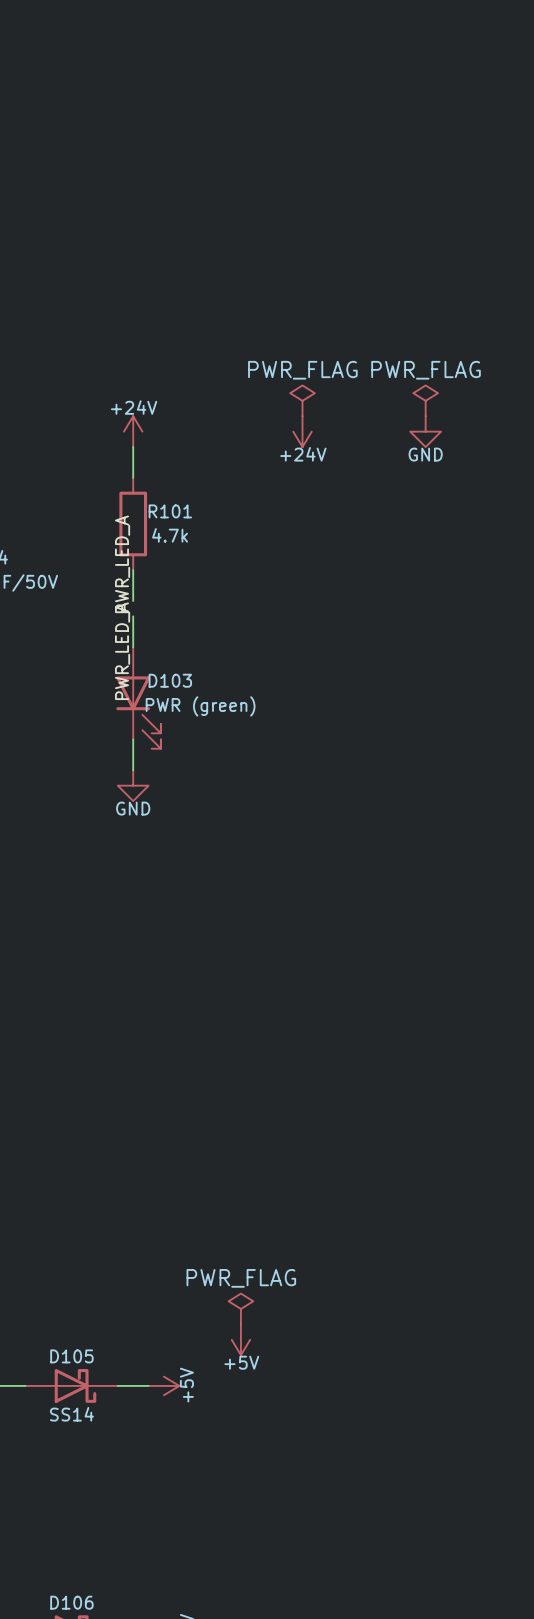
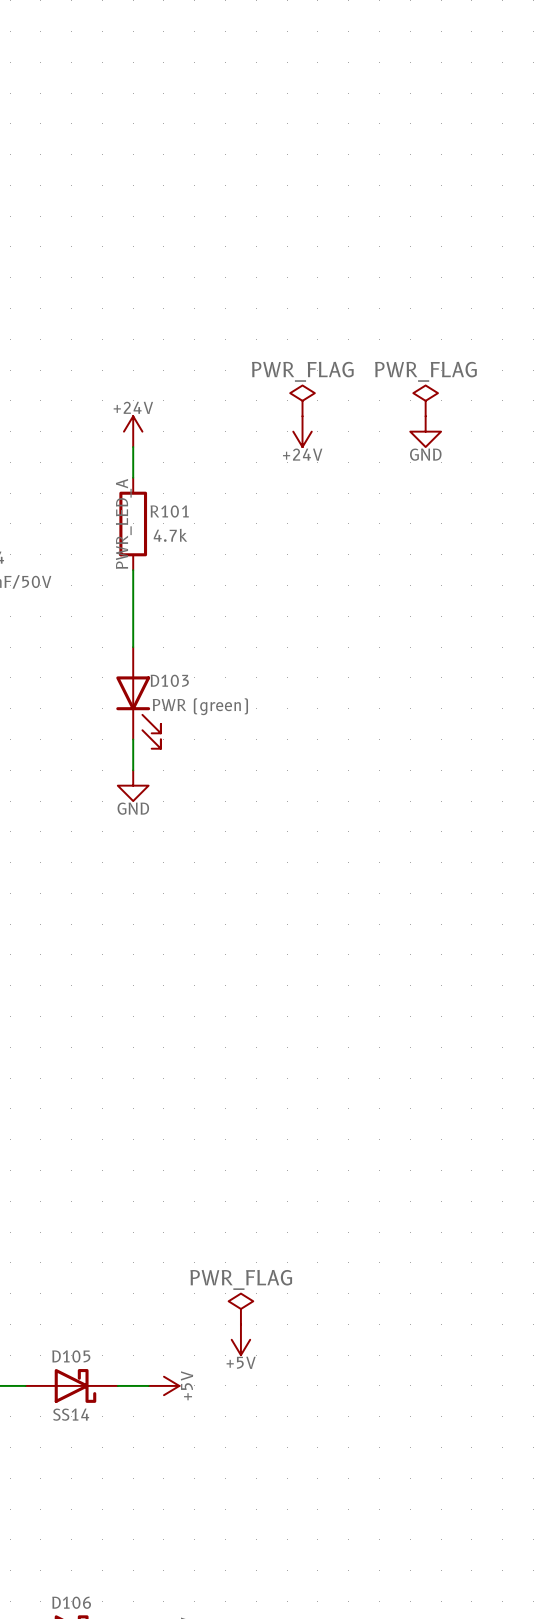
label position: PWR_LED_A (122, 564) -> PWR_LED_A (123, 523)
wire: none -> (133, 600) (133, 616)
label: PWR_LED_A (122, 651) -> none

